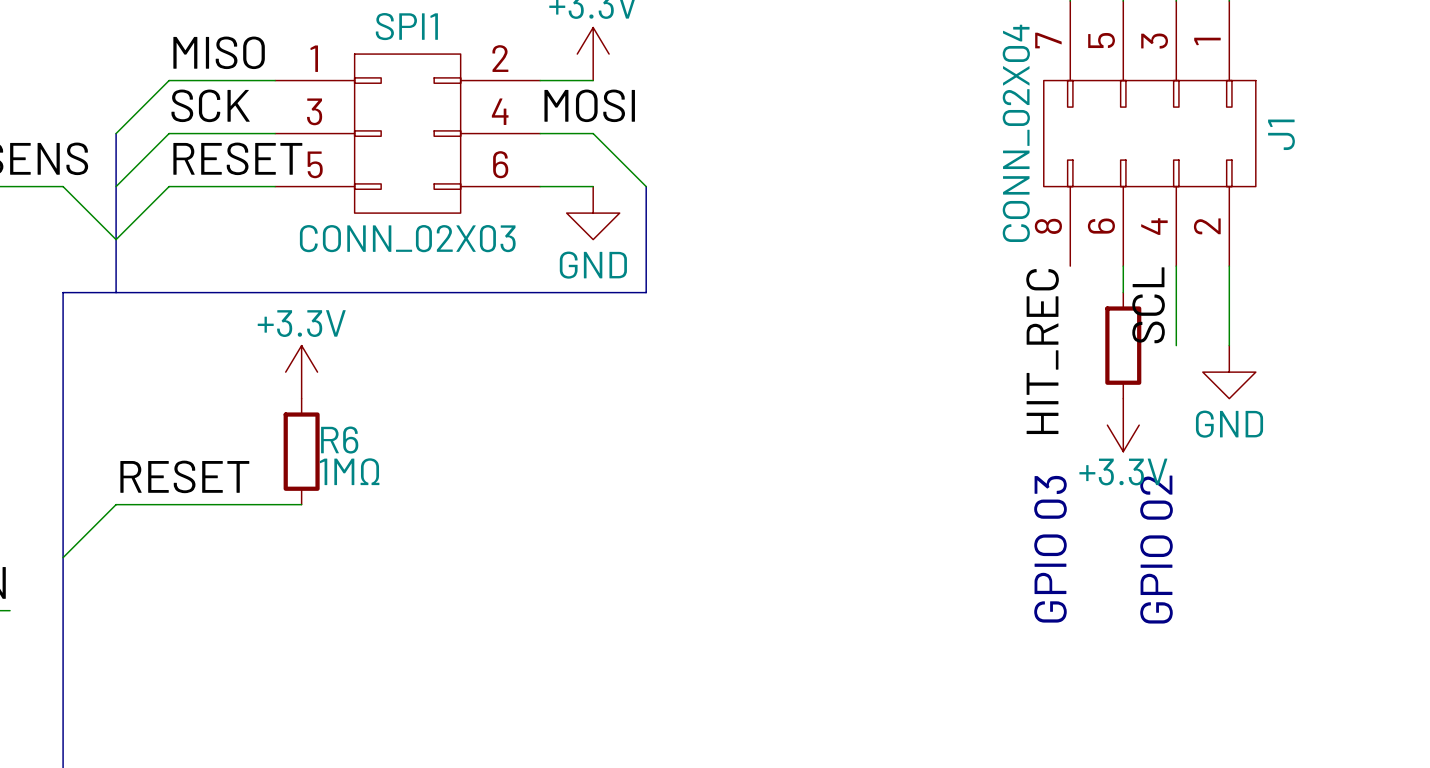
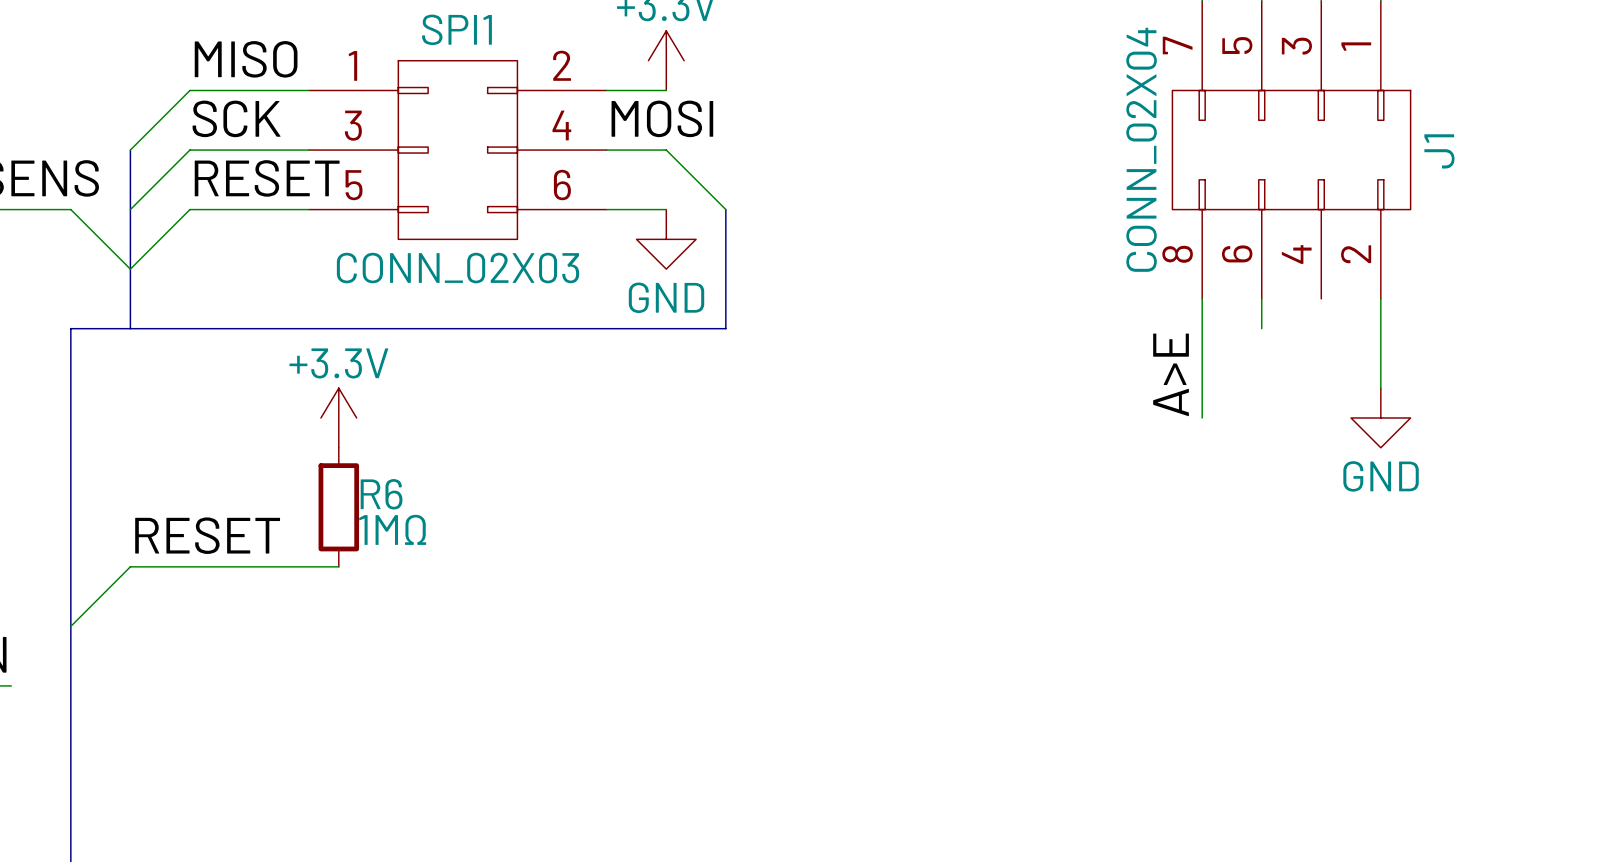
wire: none -> (1202, 298) (1202, 417)
wire: (1176, 266) (1176, 345) -> none
label: SCL (1148, 305) -> none
label: none -> A>E (1171, 374)
part: (1123, 345) -> none
label: HIT_REC (1042, 351) -> none
power symbol: +3.3V (1123, 425) -> none
text: GPIO 03 (1050, 549) -> none
text: GPIO 02 (1156, 549) -> none

